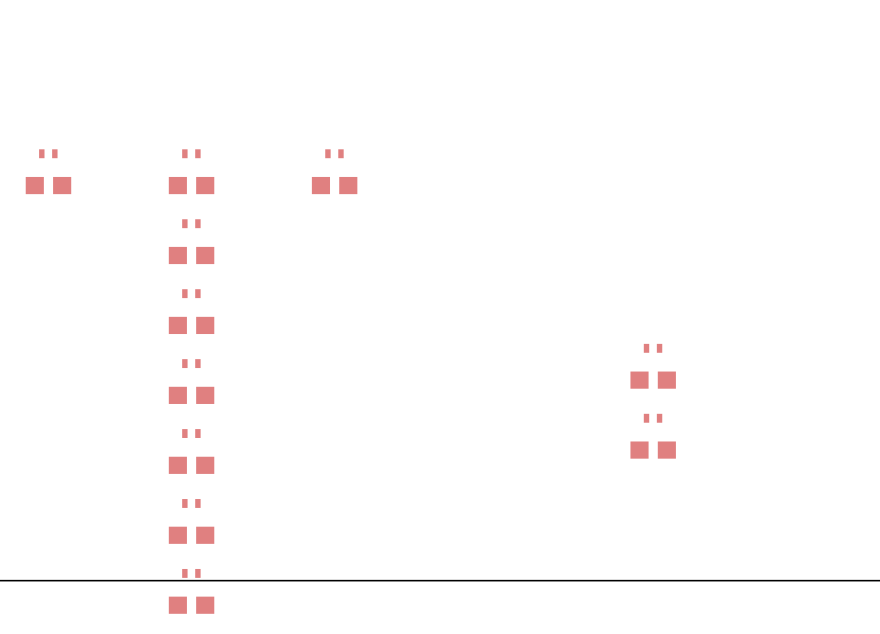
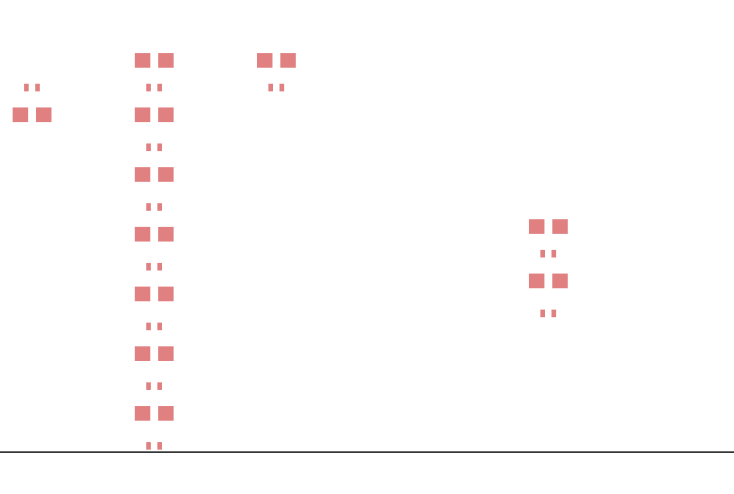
part: none -> (154, 60)
part position: (334, 185) -> (276, 60)
part position: (653, 450) -> (548, 226)
part: (191, 605) -> none

